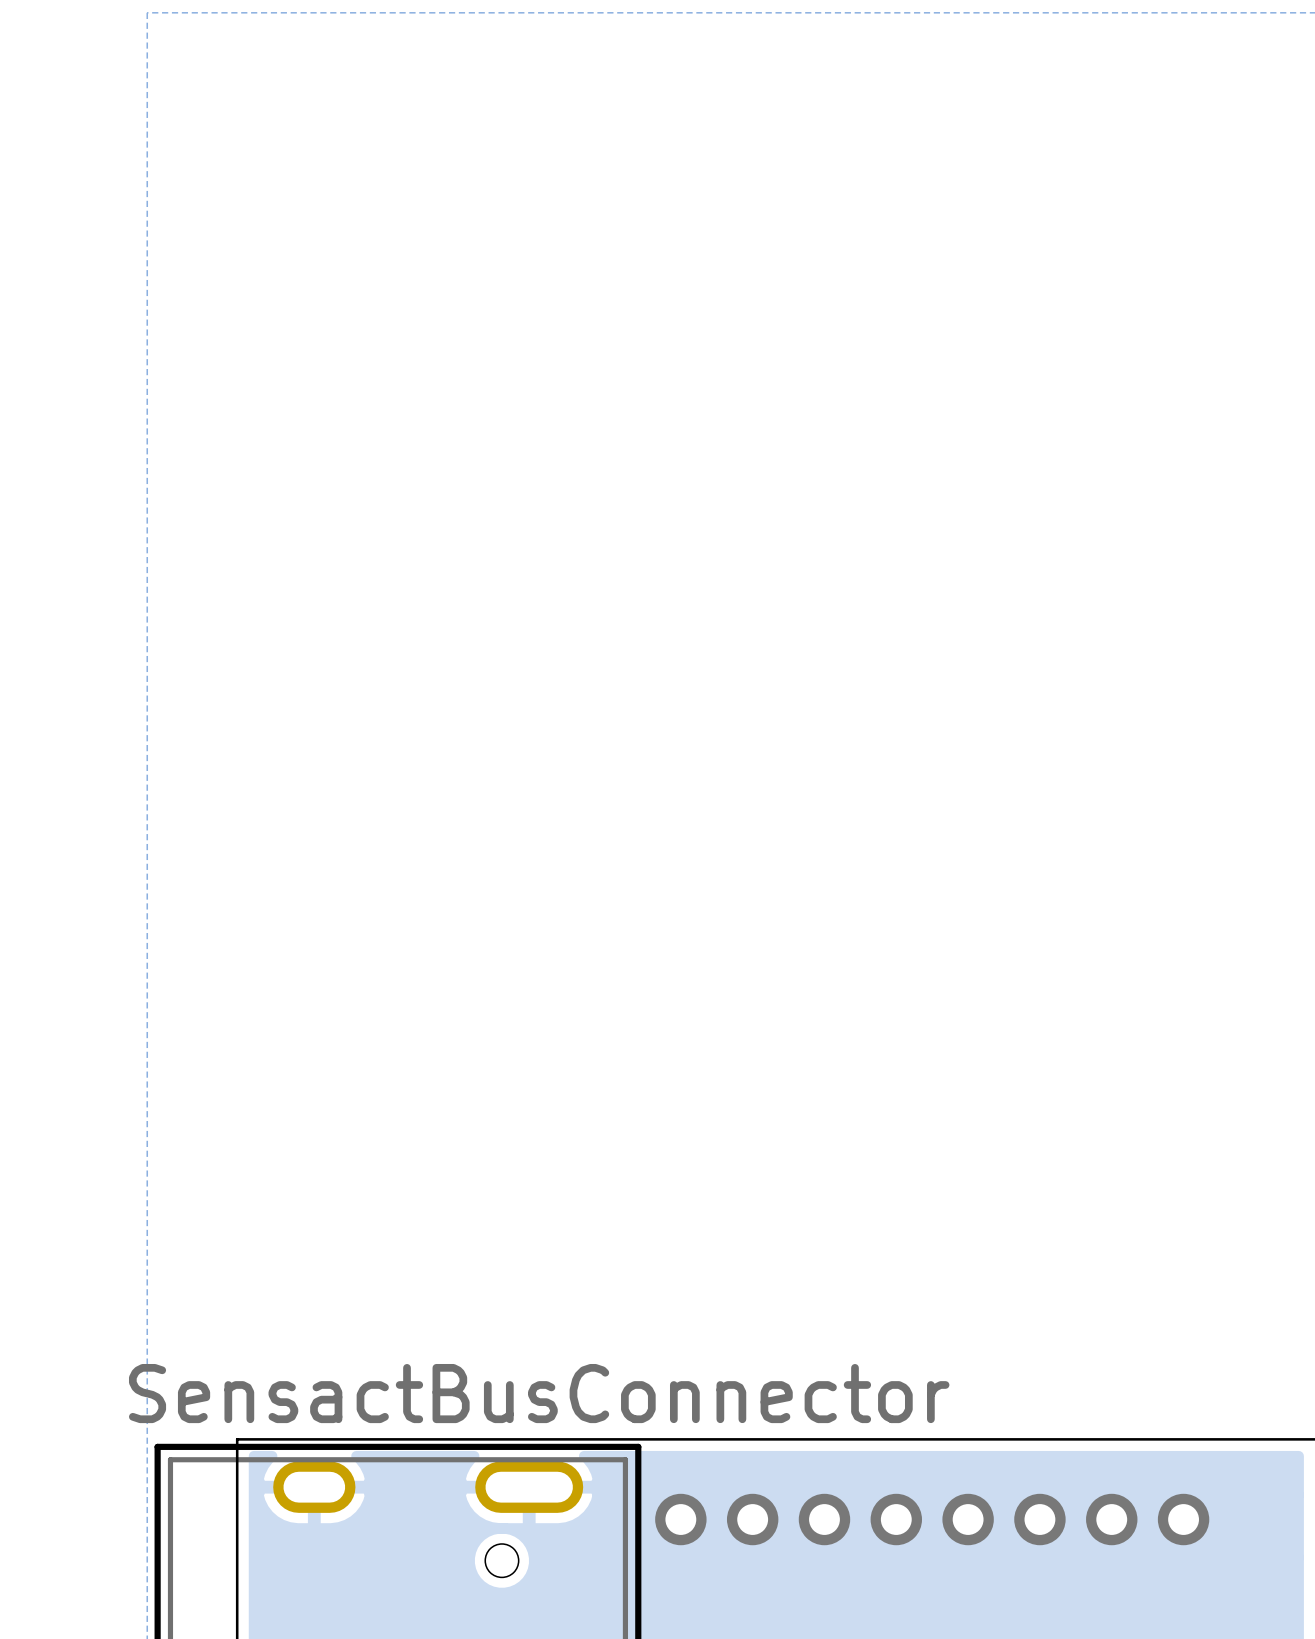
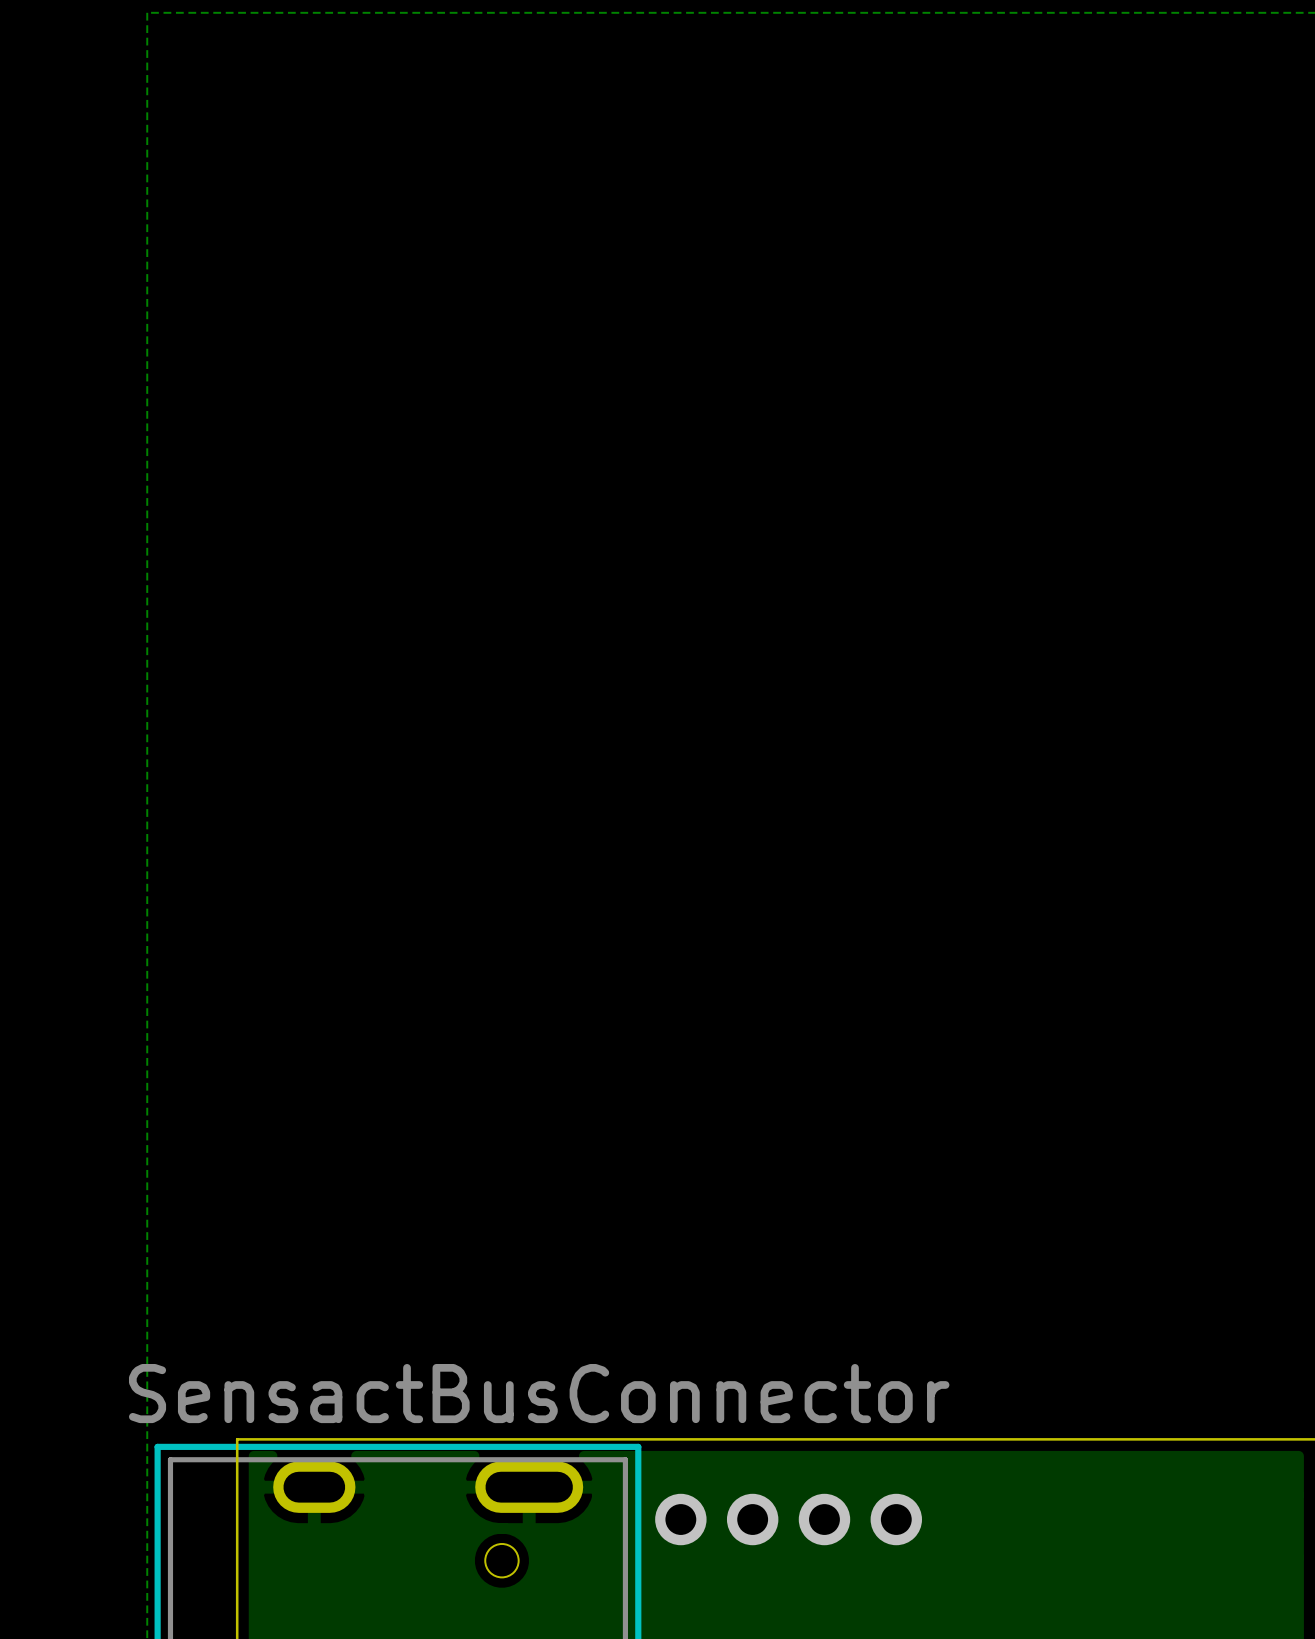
via: (968, 1519) -> none
via: (1039, 1519) -> none
via: (1111, 1519) -> none
via: (1183, 1519) -> none

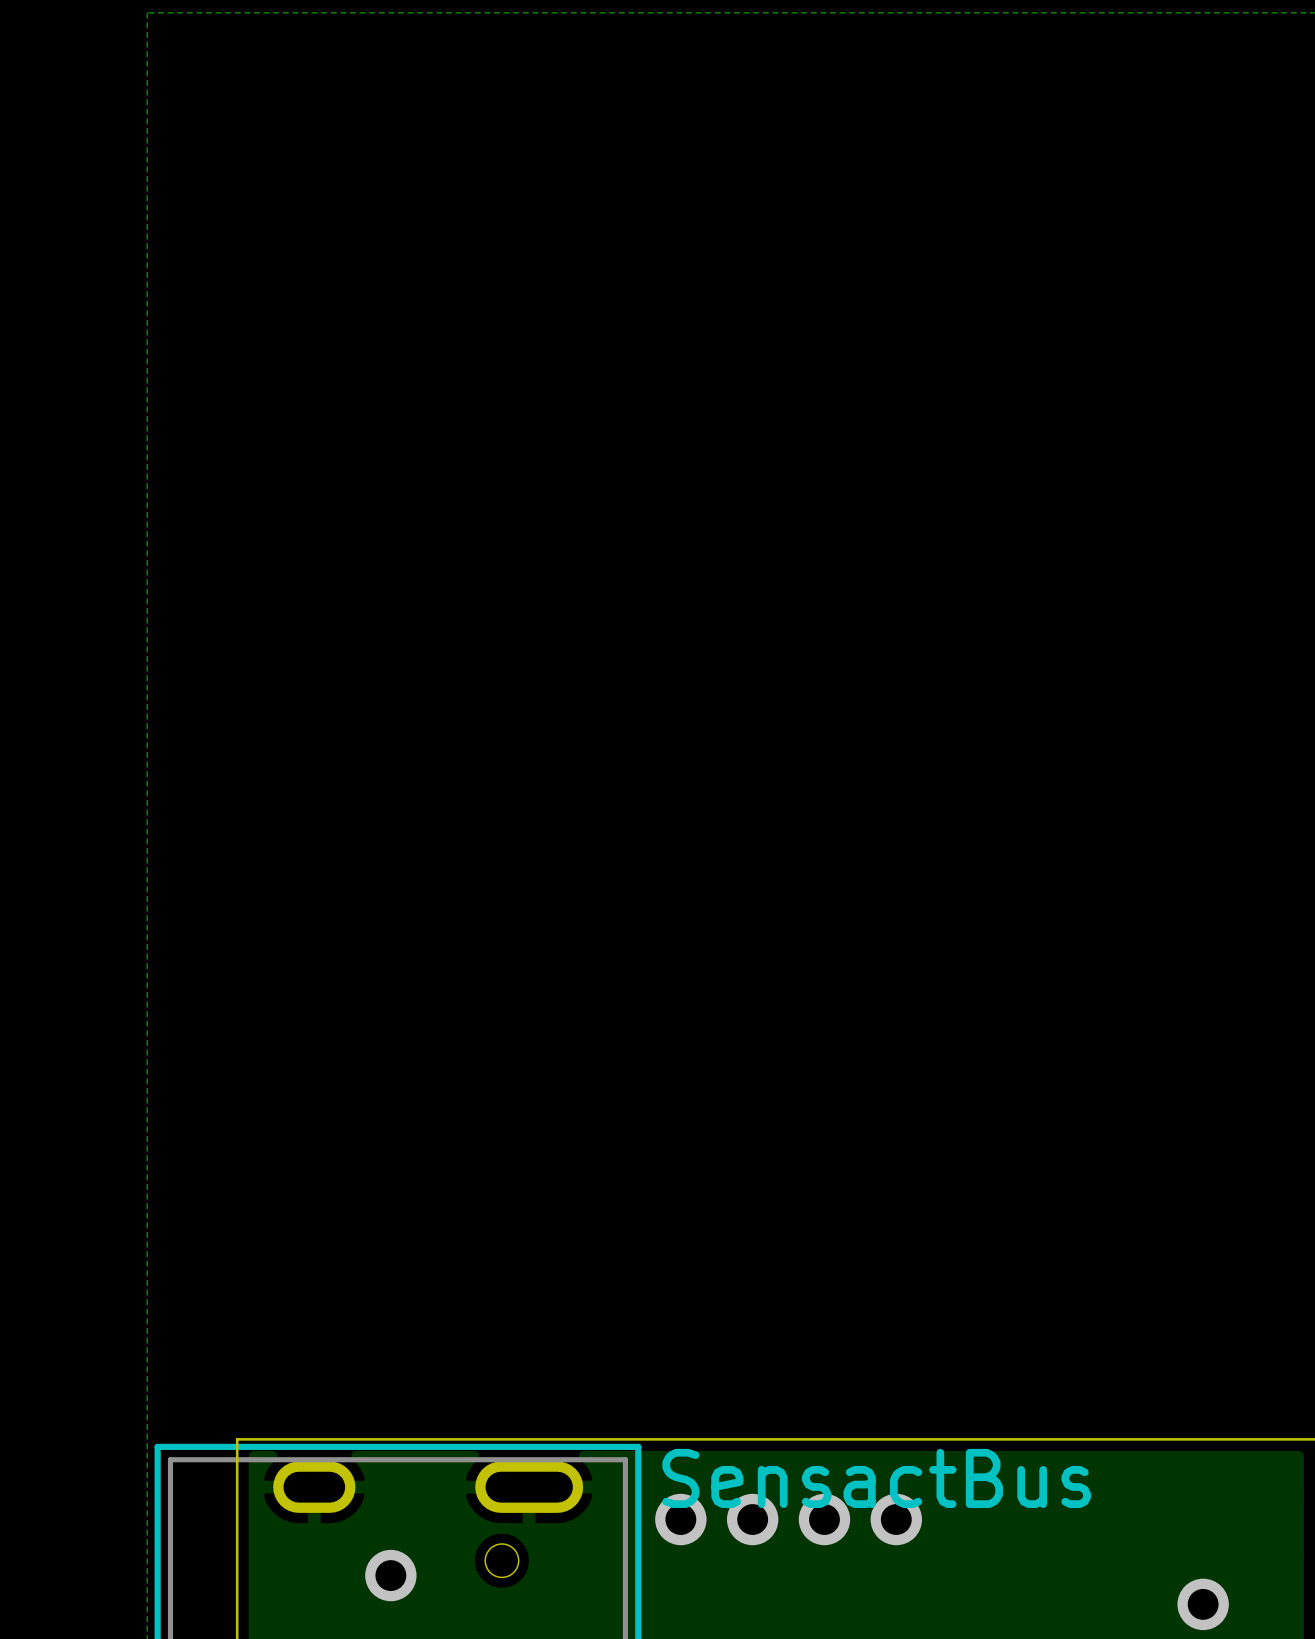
part value: SensactBusConnector (539, 1393) -> SensactBus (876, 1478)
via: none -> (390, 1575)
via: none -> (1203, 1604)

